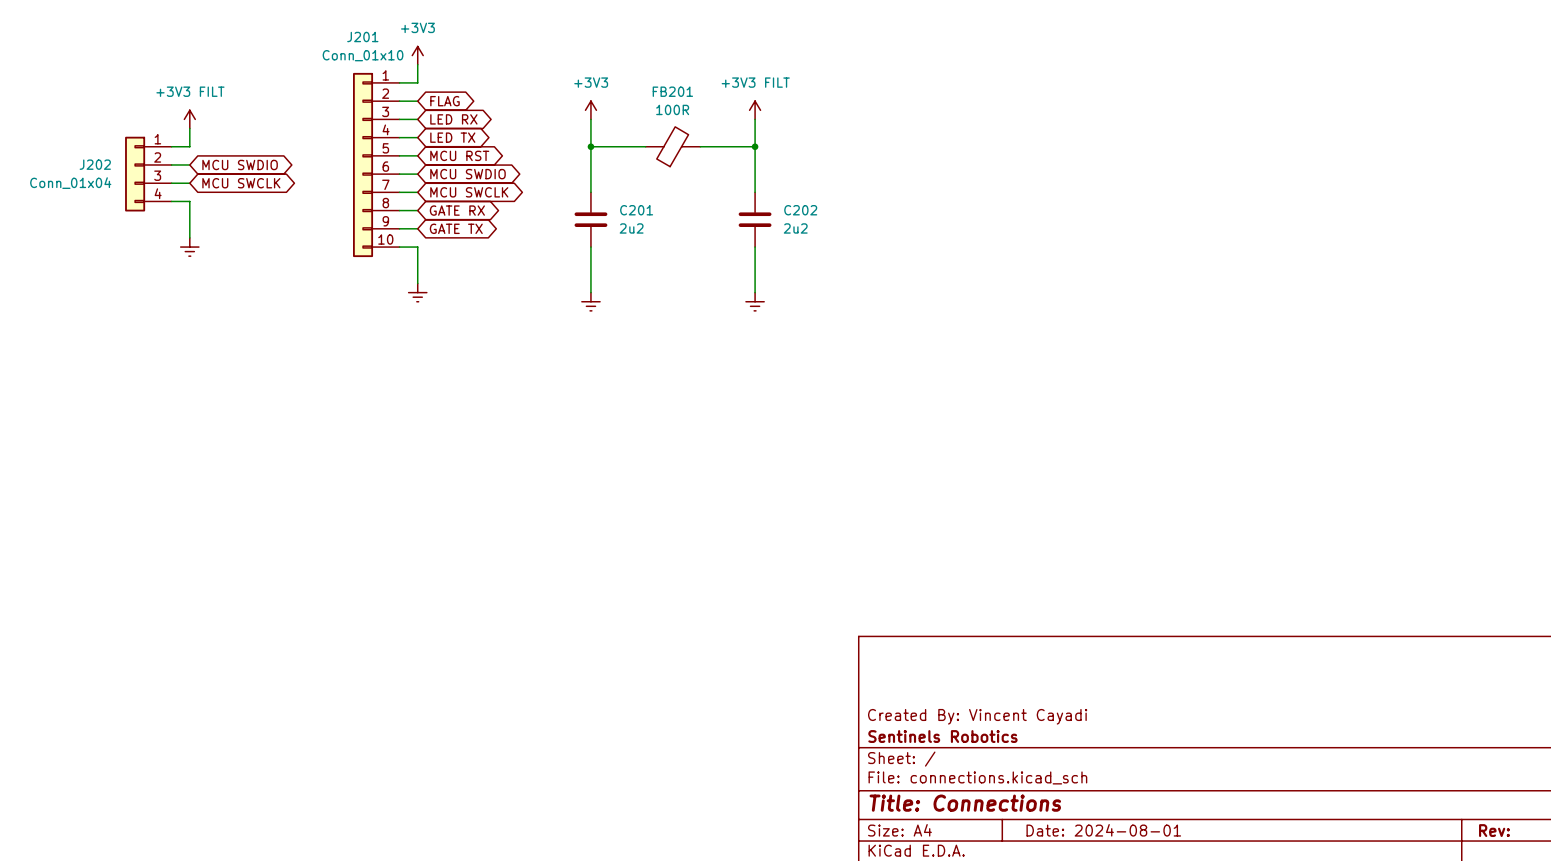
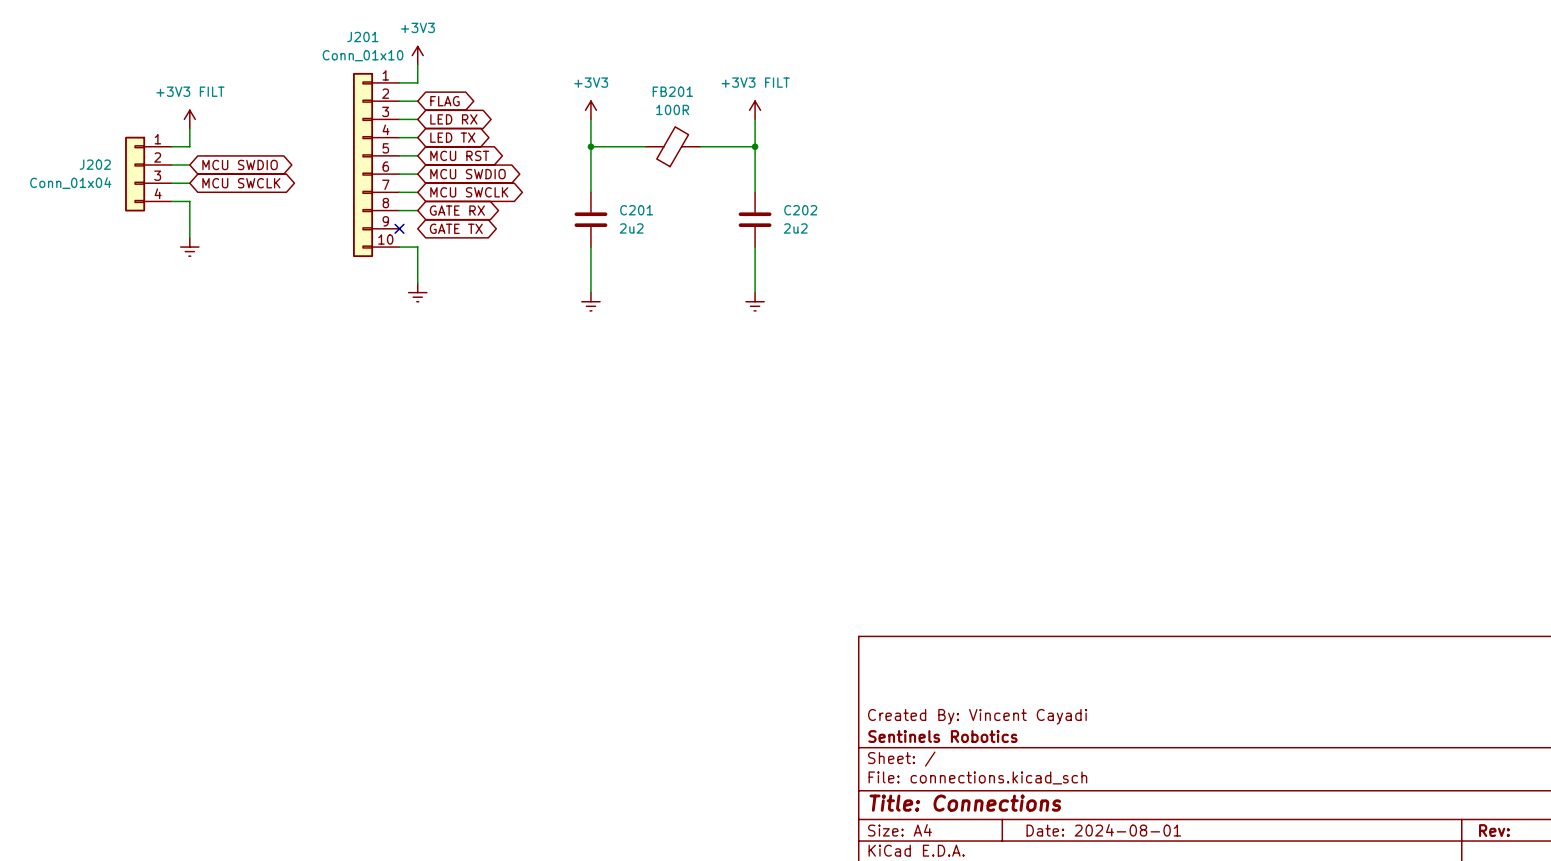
wire: (399, 228) (417, 228) -> none
no-connect mark: none -> (399, 228)

